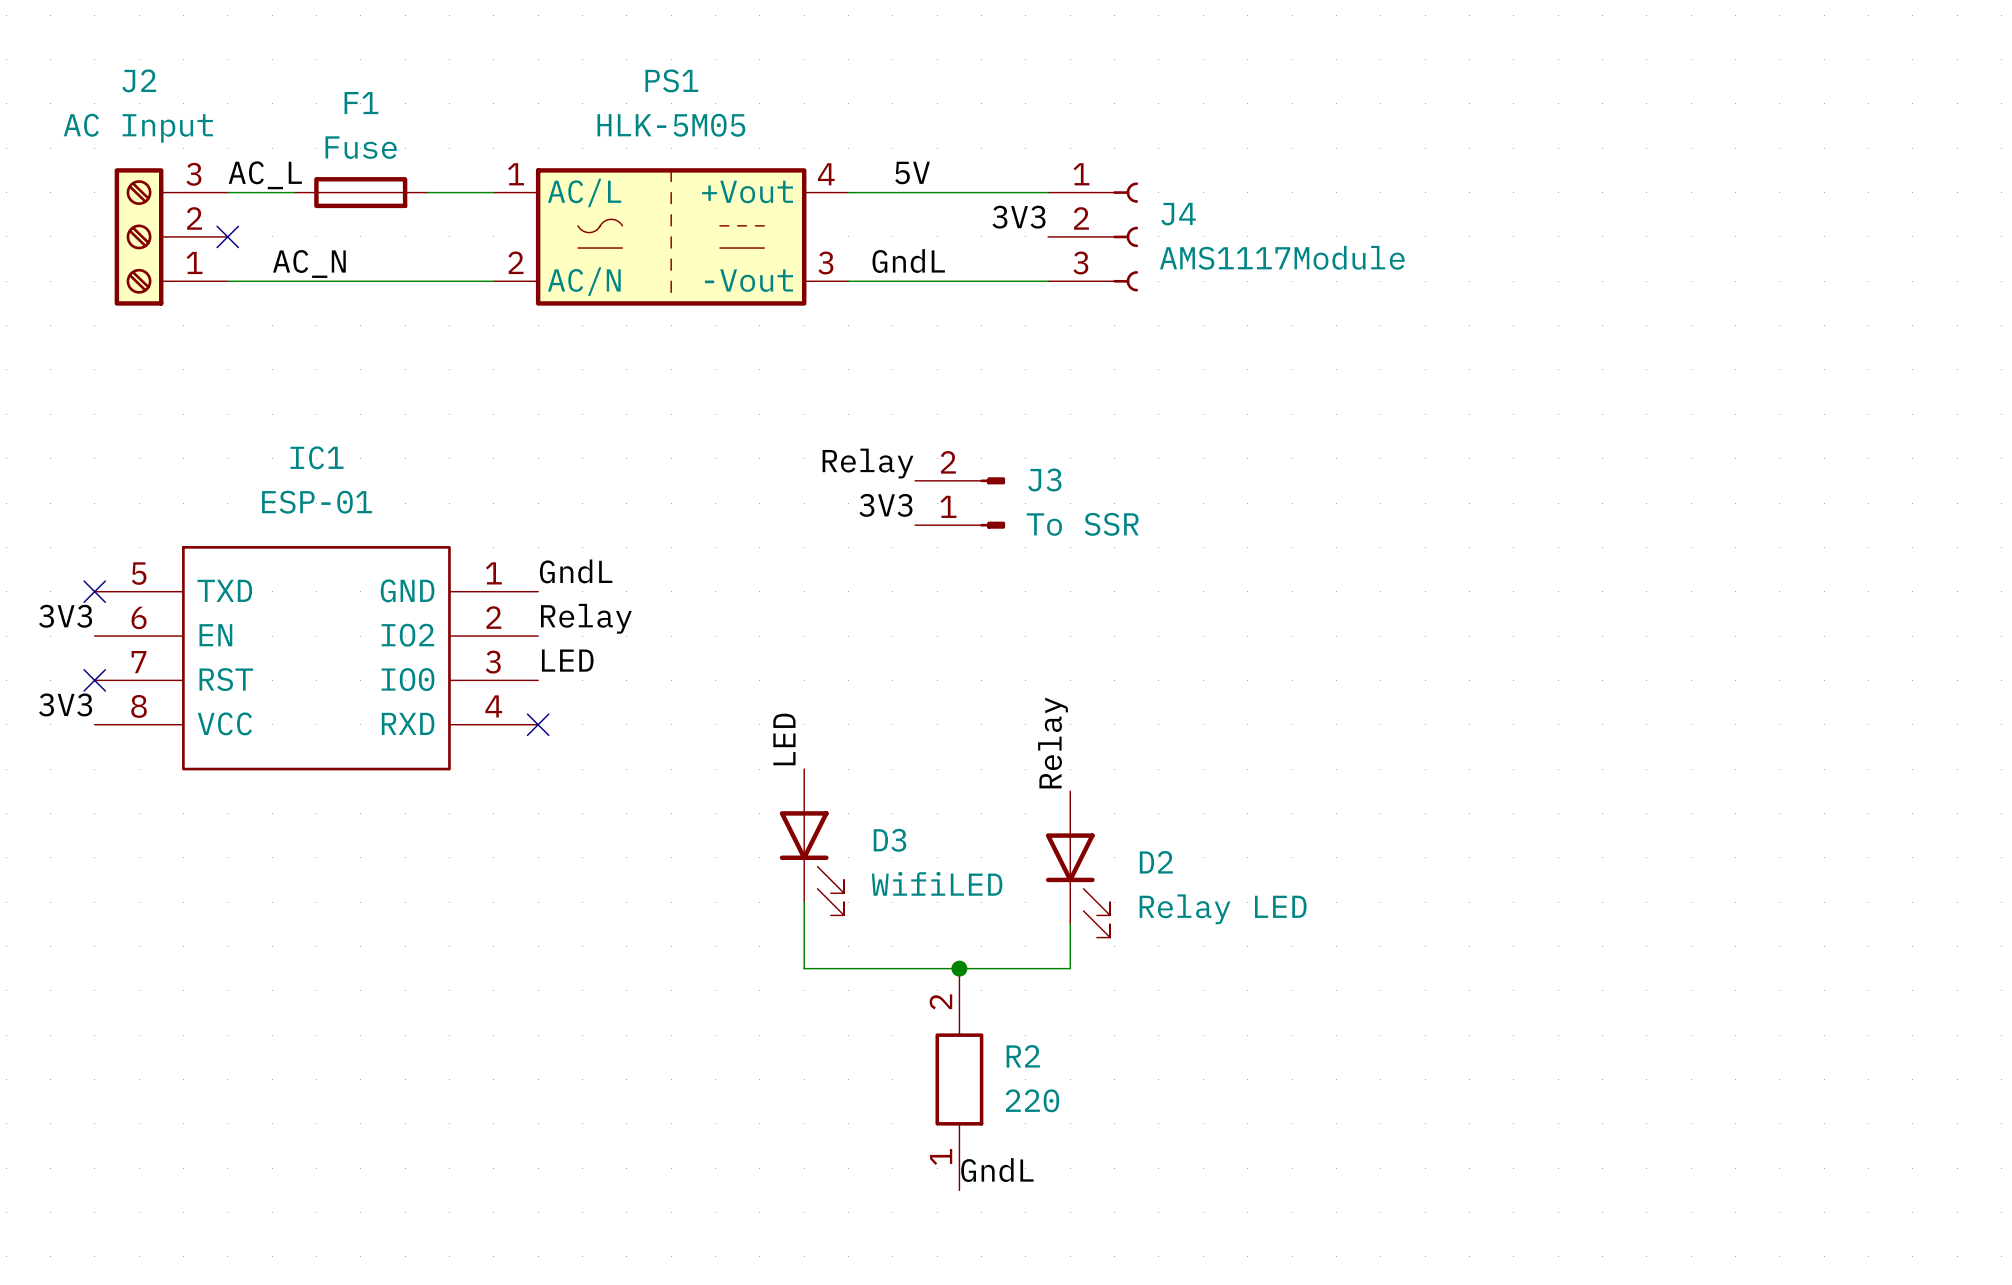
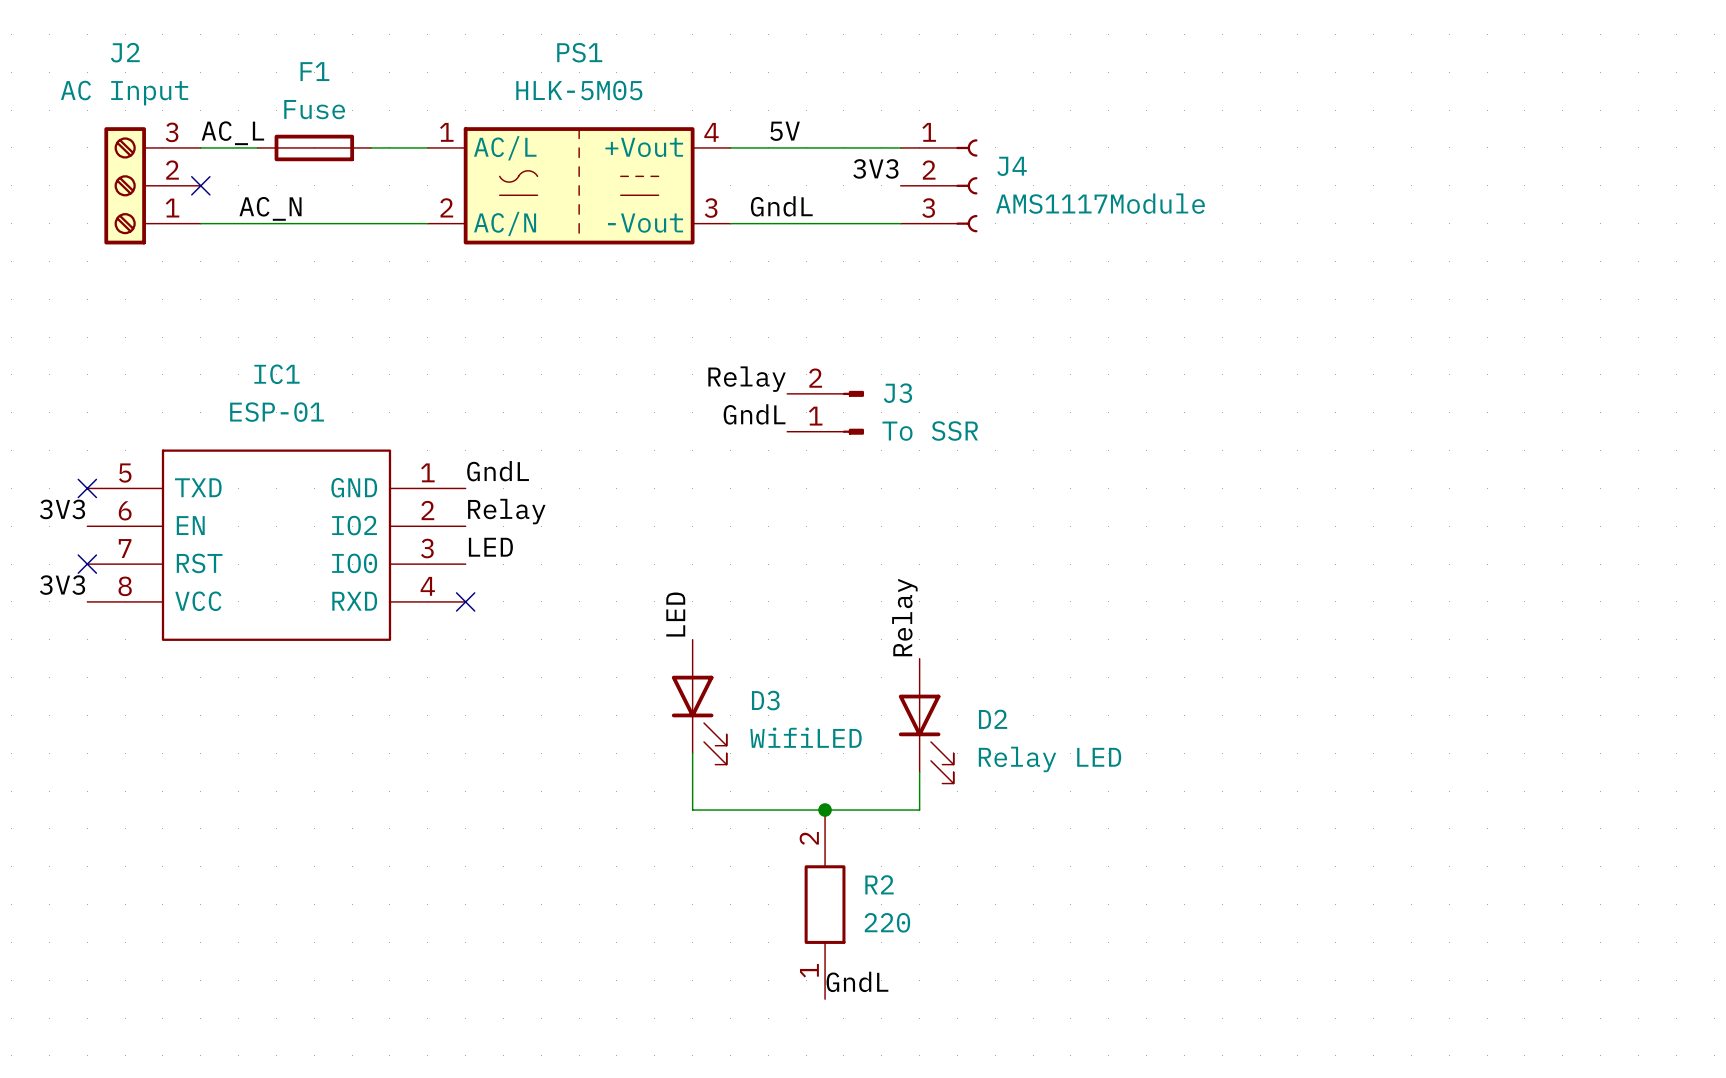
label: 3V3 (885, 505) -> GndL (754, 414)

